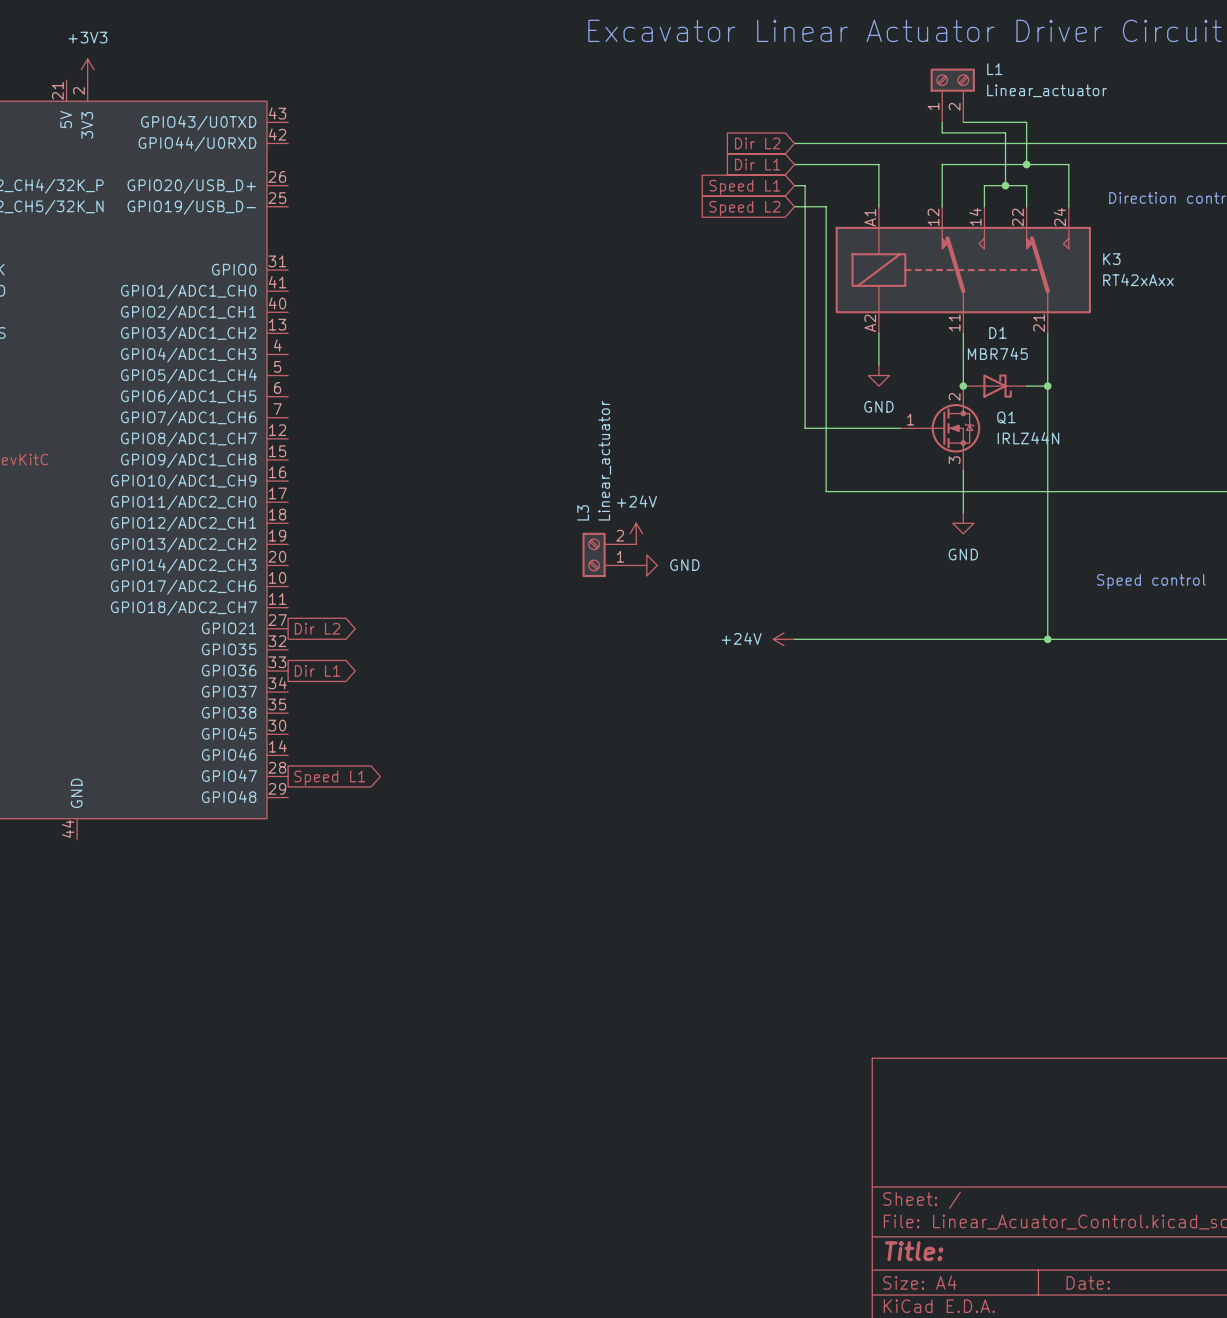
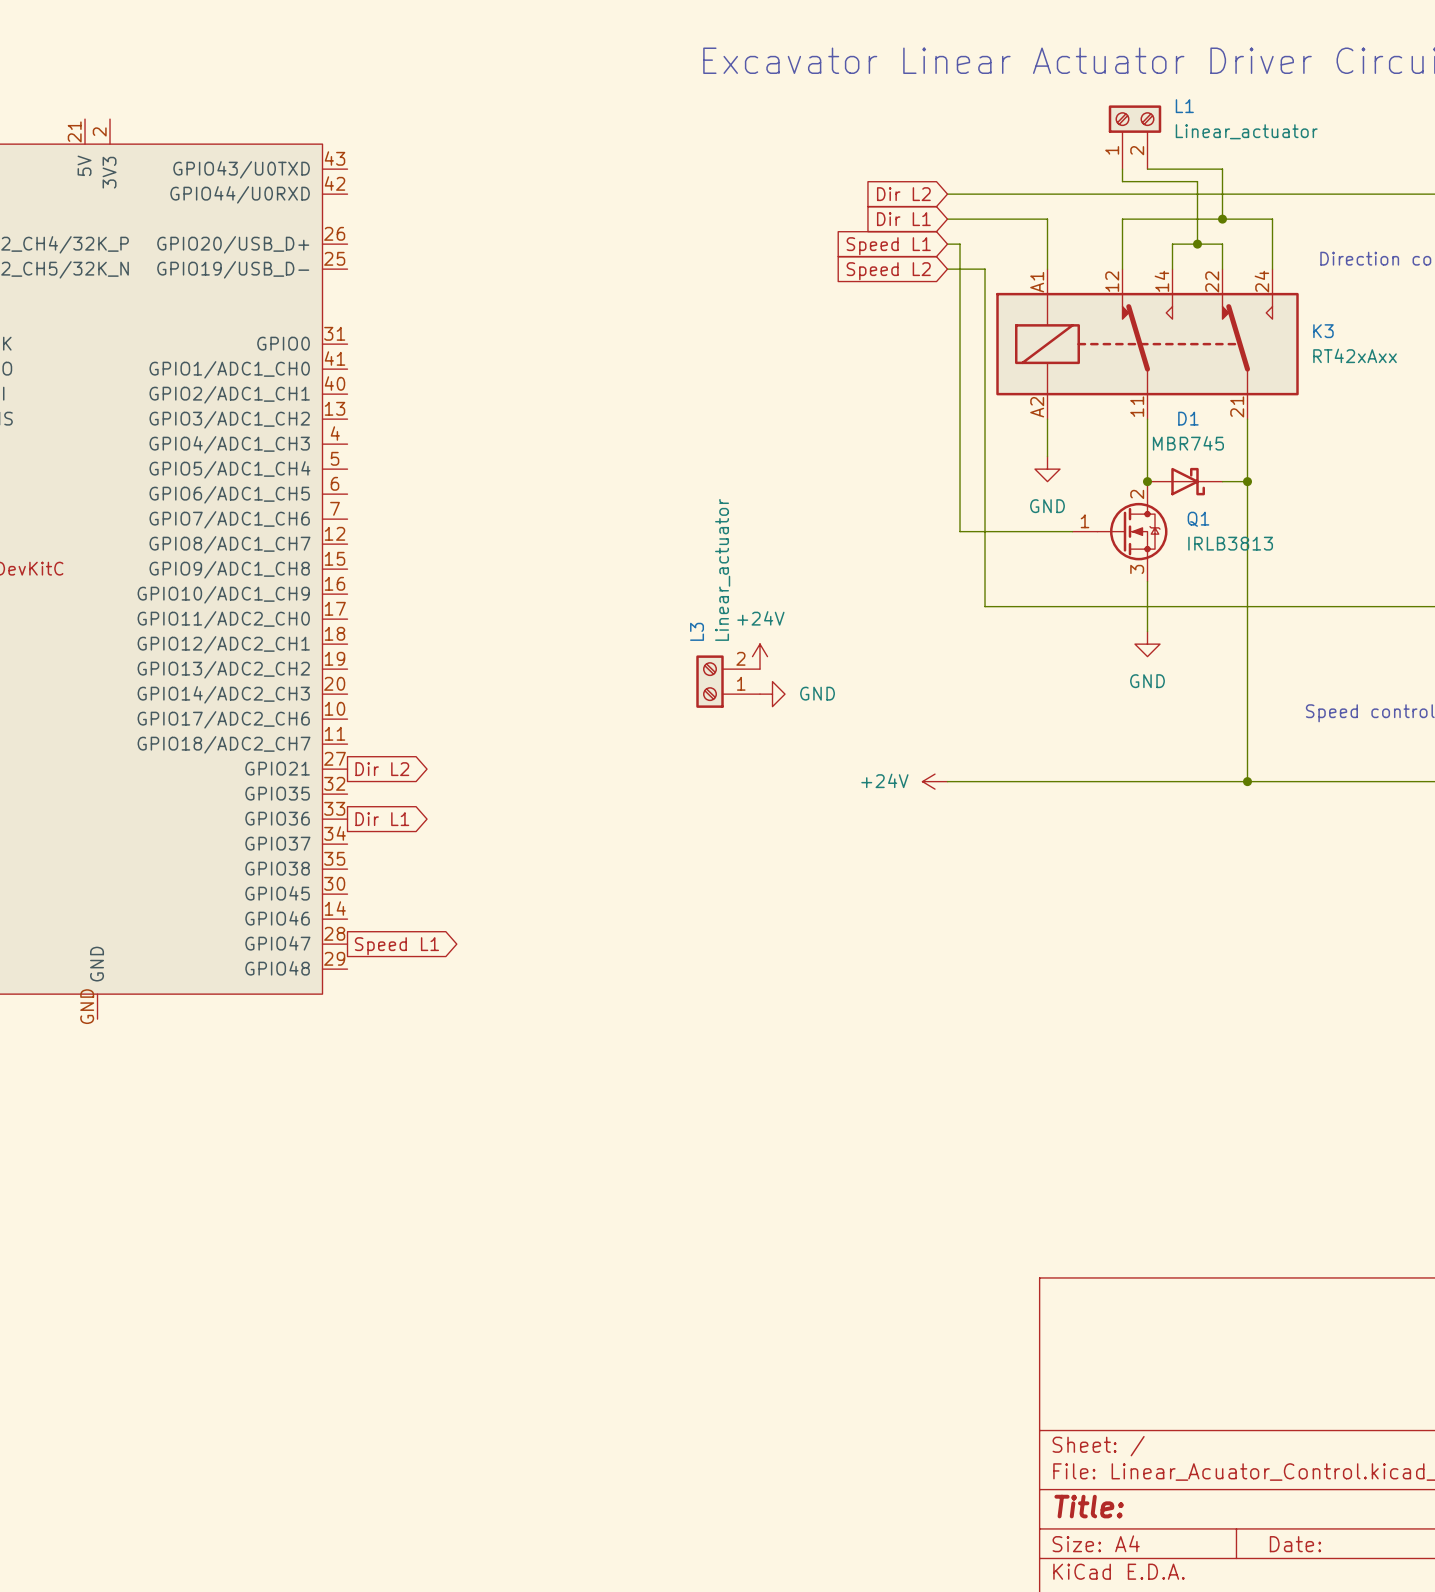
power symbol: +3V3 (87, 69) -> none
Q1 value: IRLZ44N (1028, 438) -> IRLB3813 (1230, 543)
part pin number: 44 (68, 828) -> GND (87, 1006)

